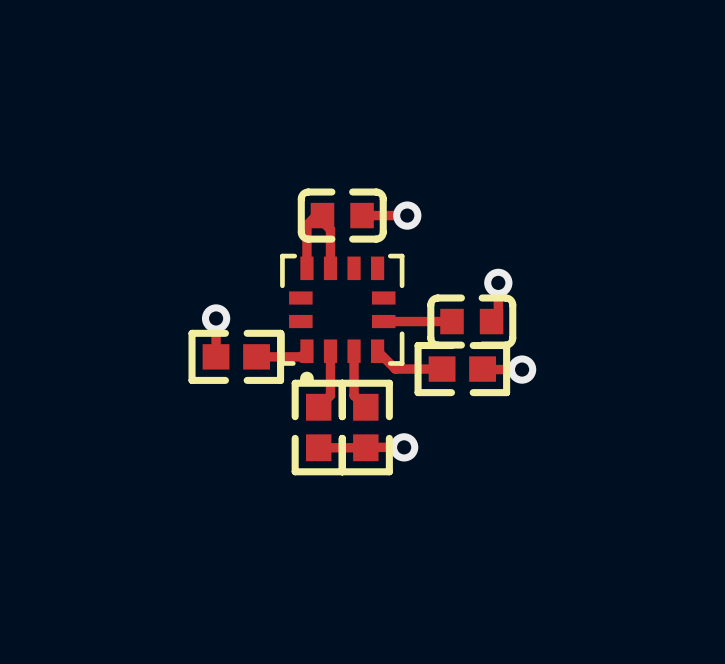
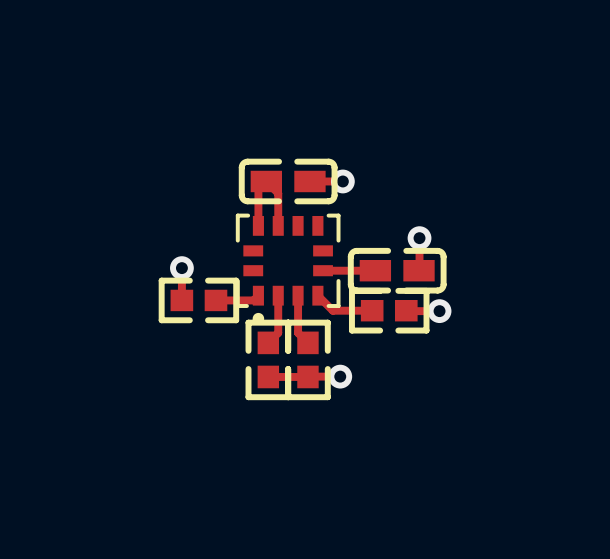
part footprint: [297, 188, 387, 243] -> [238, 158, 338, 205]
part footprint: [427, 294, 517, 349] -> [347, 247, 447, 294]

